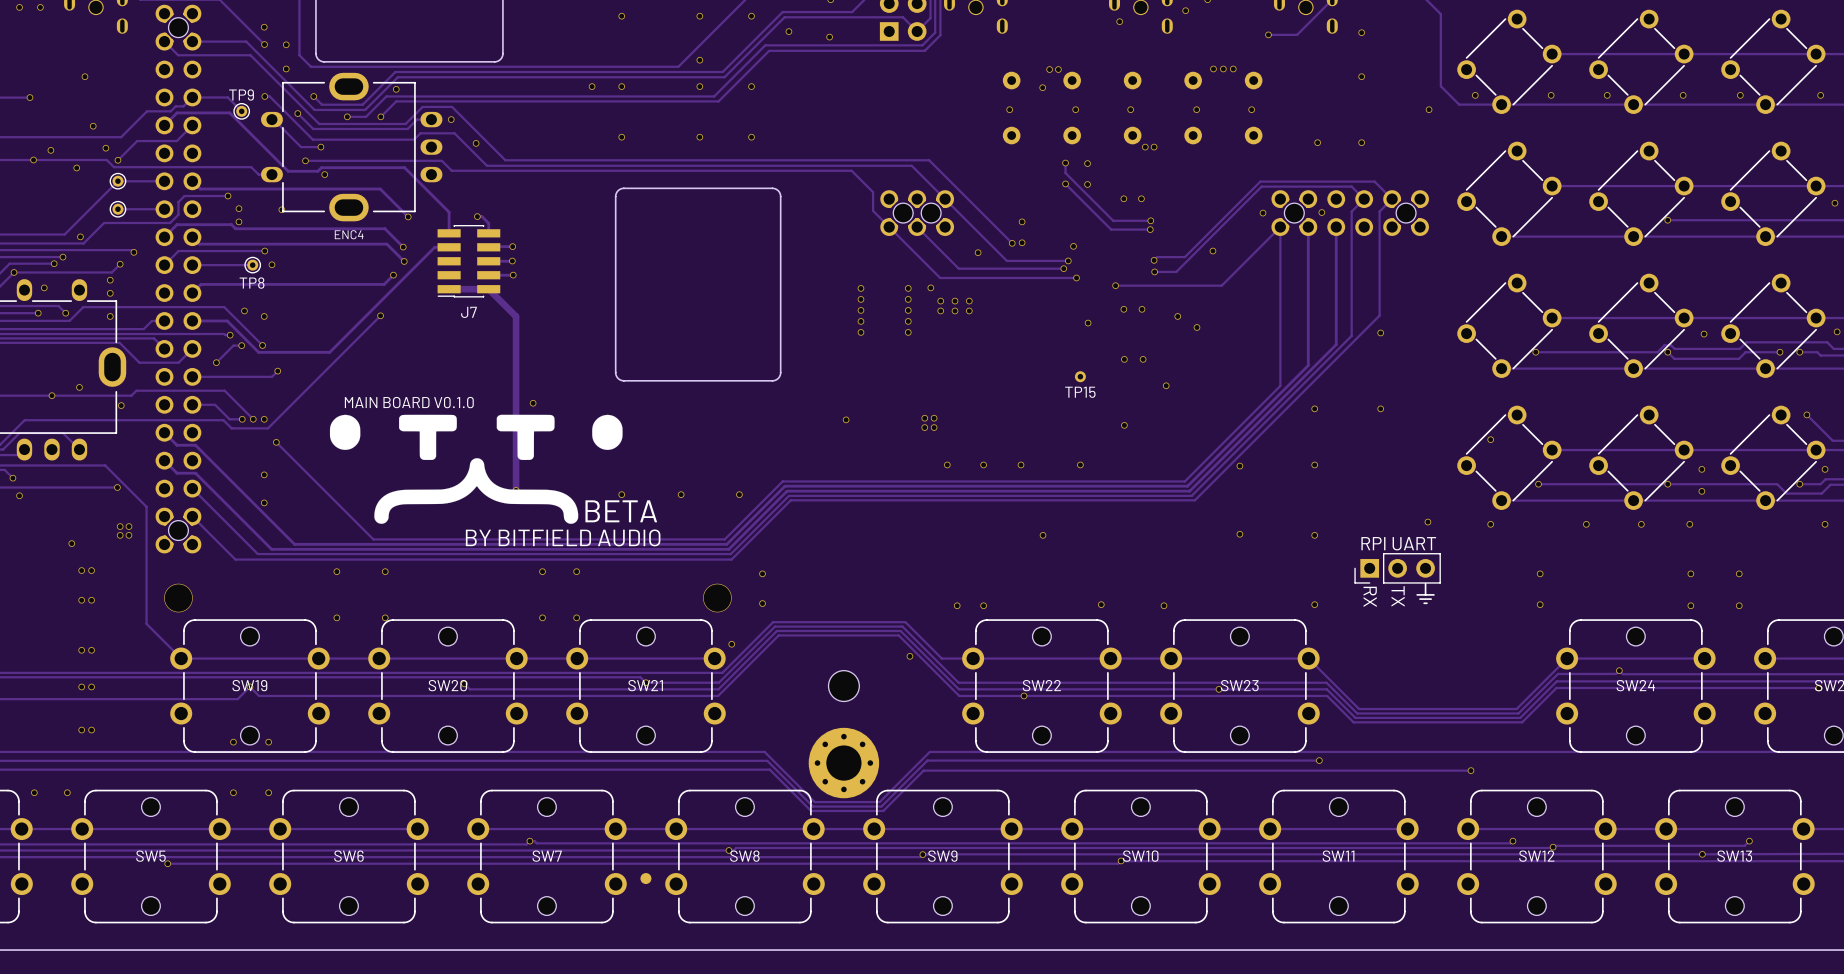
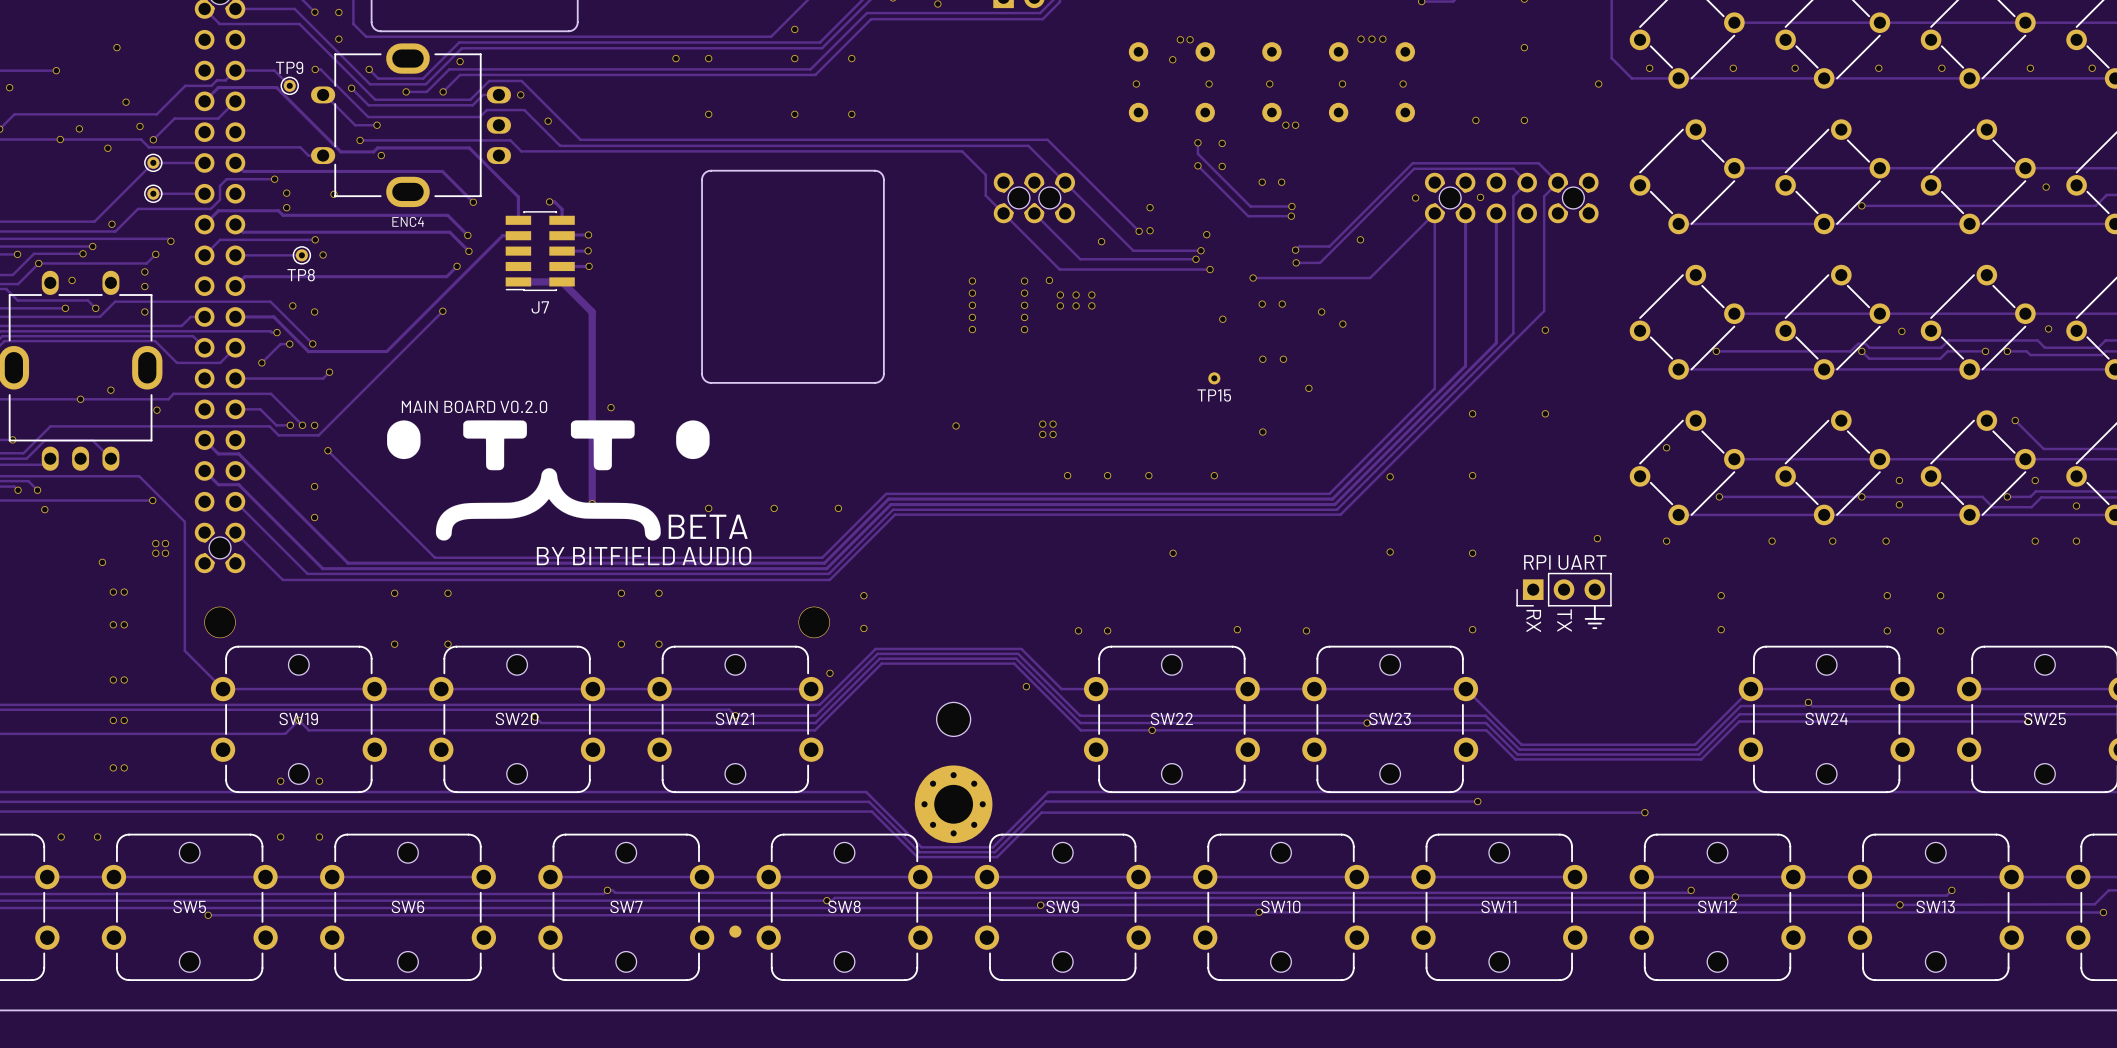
text: MAIN BOARD V0.1.0 (409, 402) -> MAIN BOARD V0.2.0 (474, 406)

